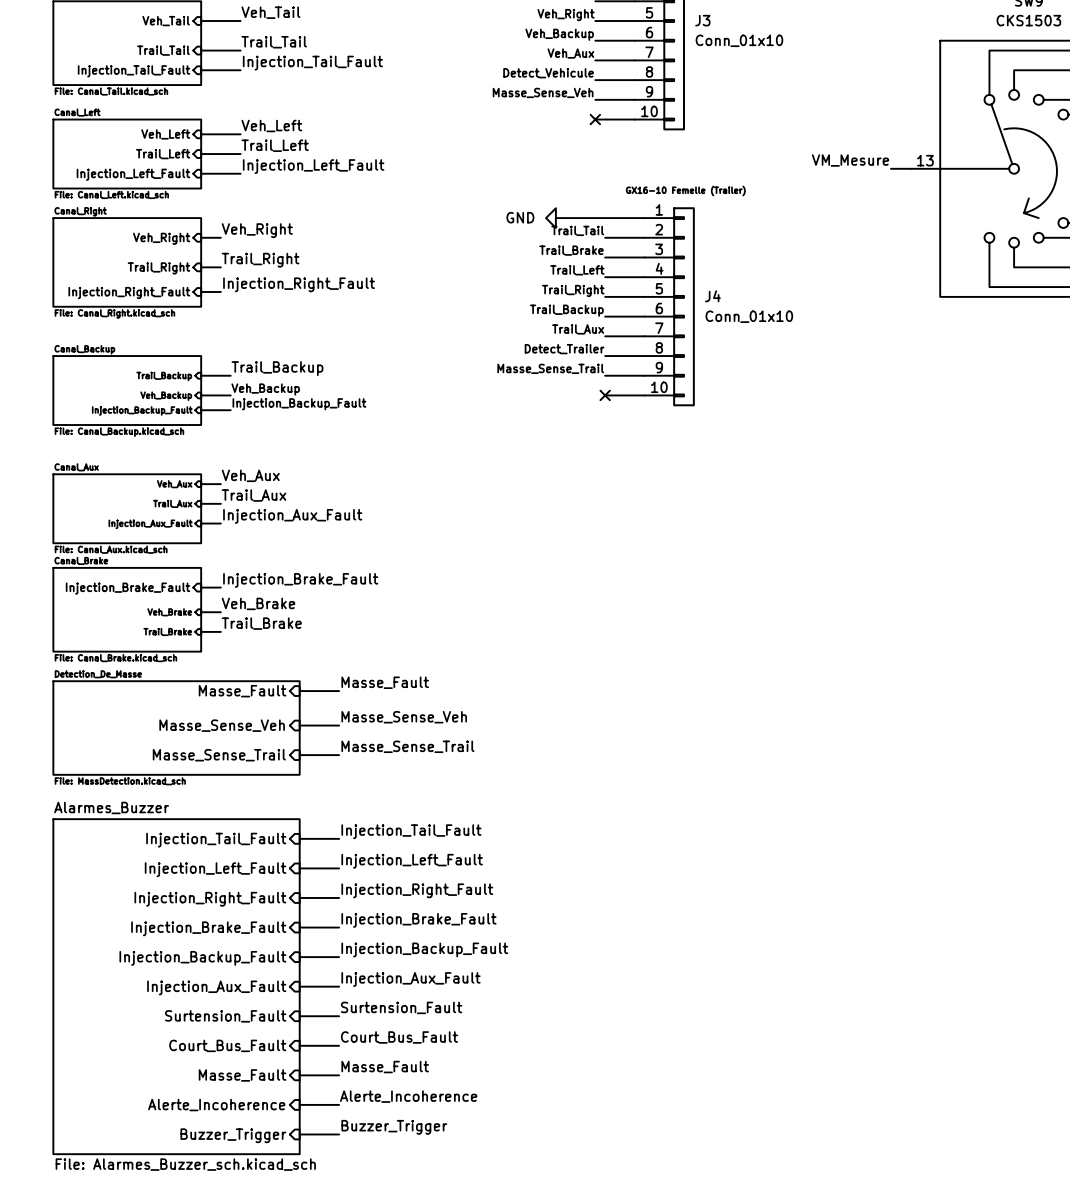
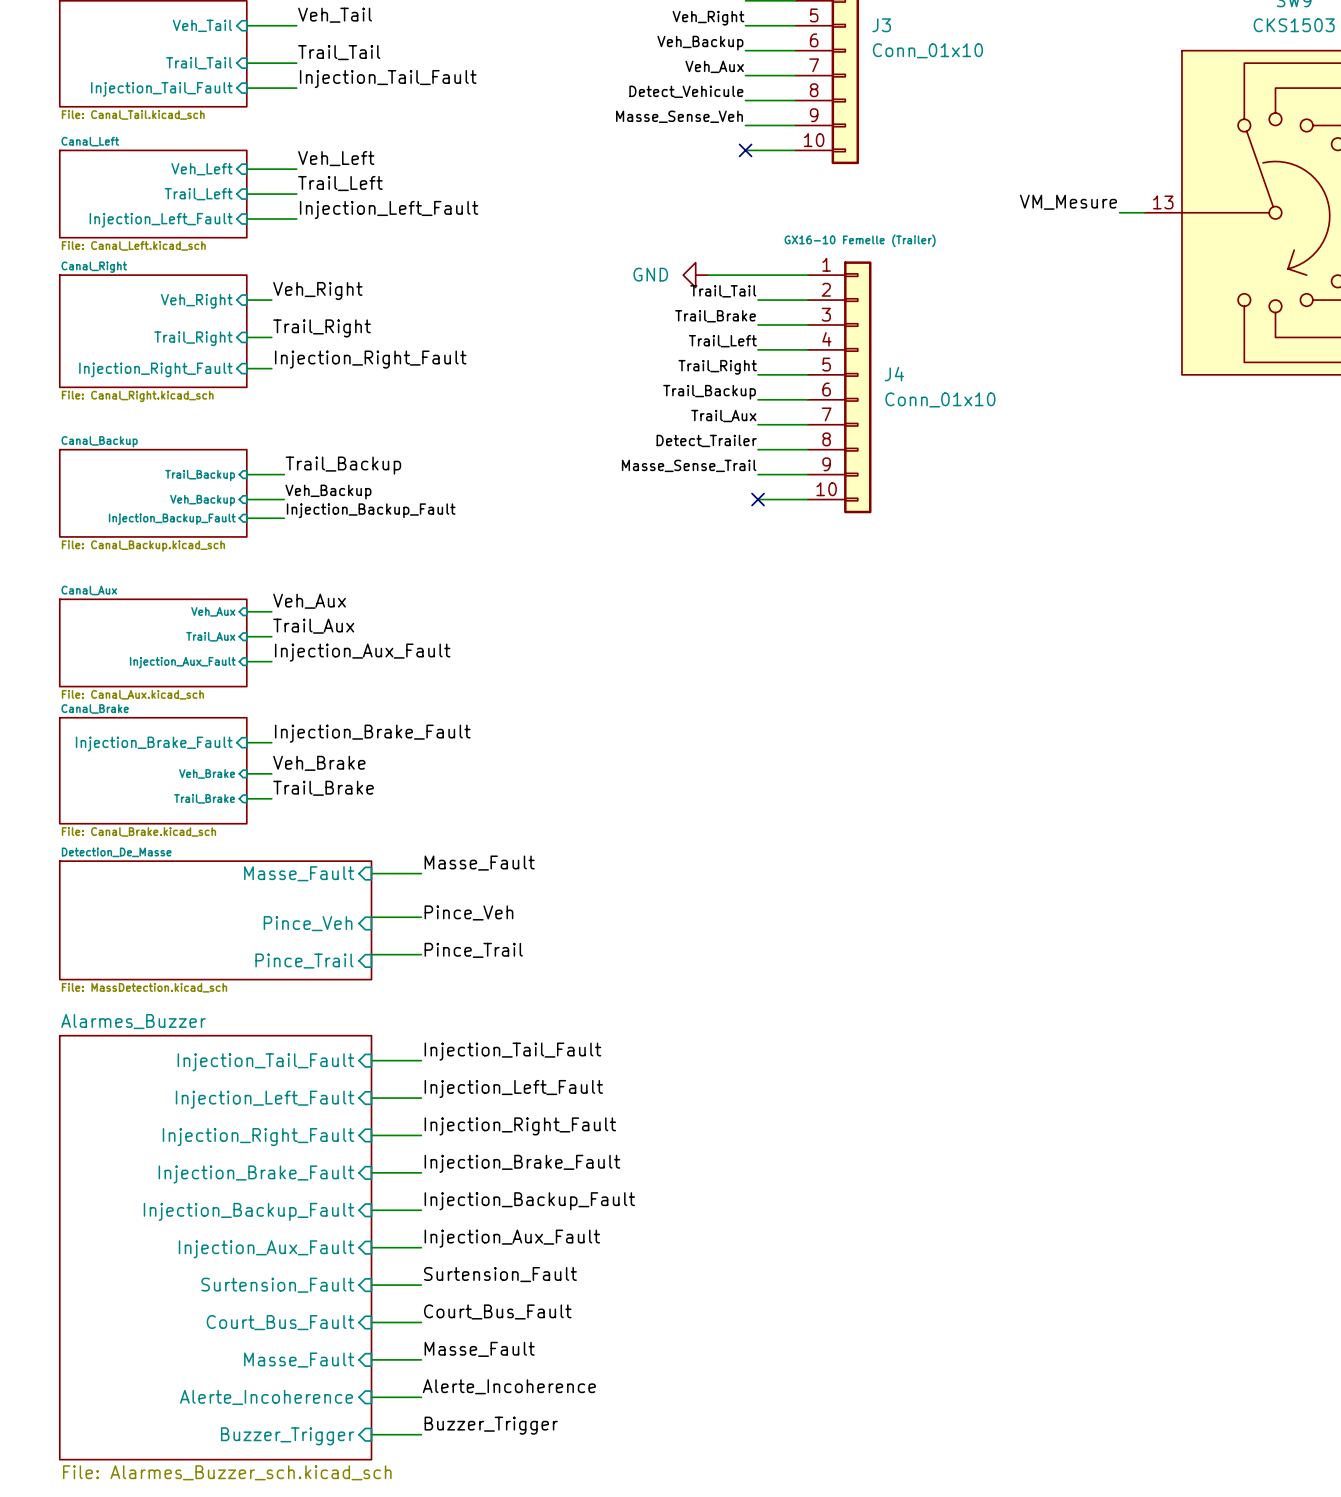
label: Masse_Sense_Veh (404, 717) -> Pince_Veh (468, 912)
sheet pin: Masse_Sense_Veh (222, 725) -> Pince_Veh (308, 923)
label: Masse_Sense_Trail (407, 746) -> Pince_Trail (473, 950)
sheet pin: Masse_Sense_Trail (219, 755) -> Pince_Trail (304, 961)

